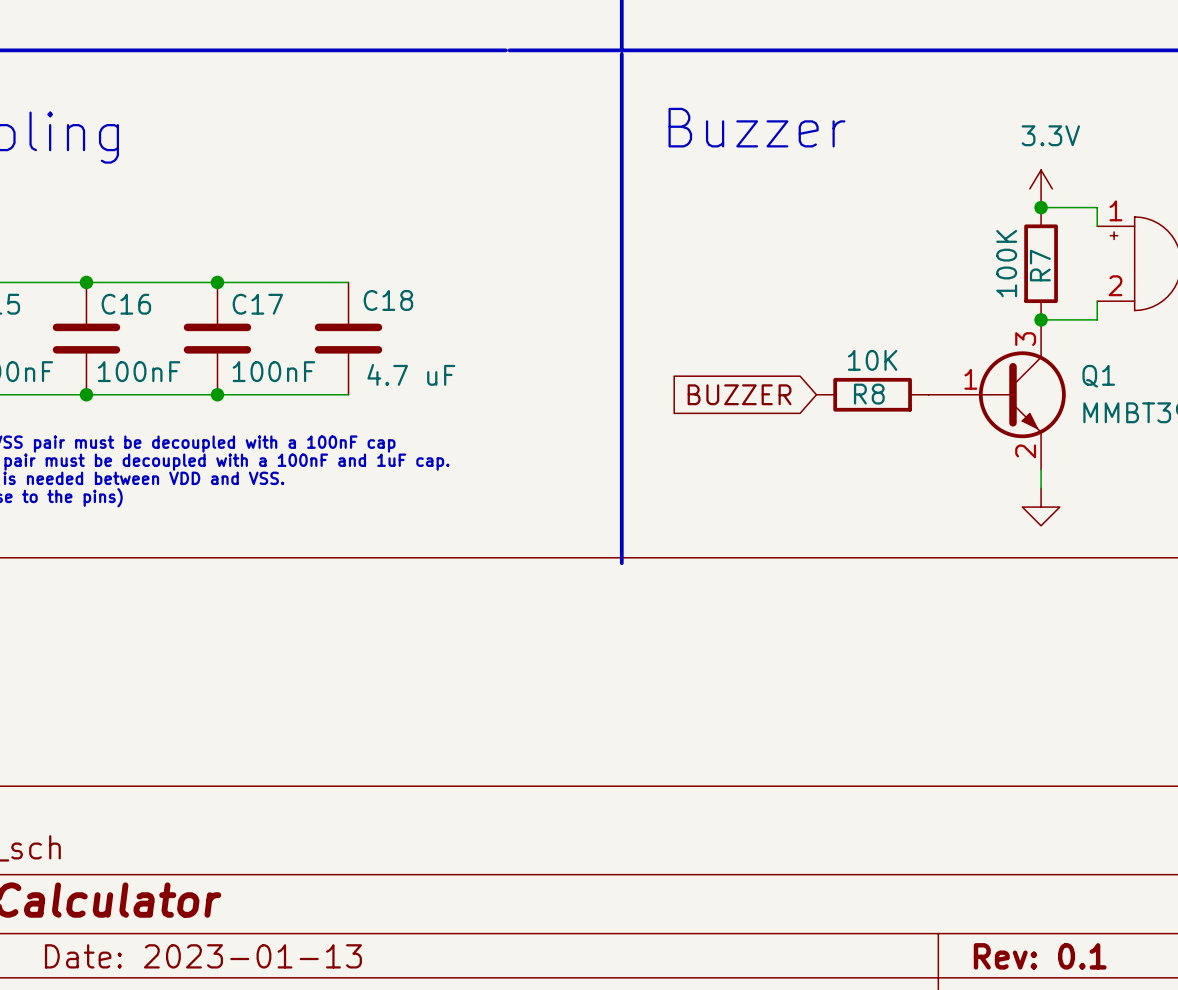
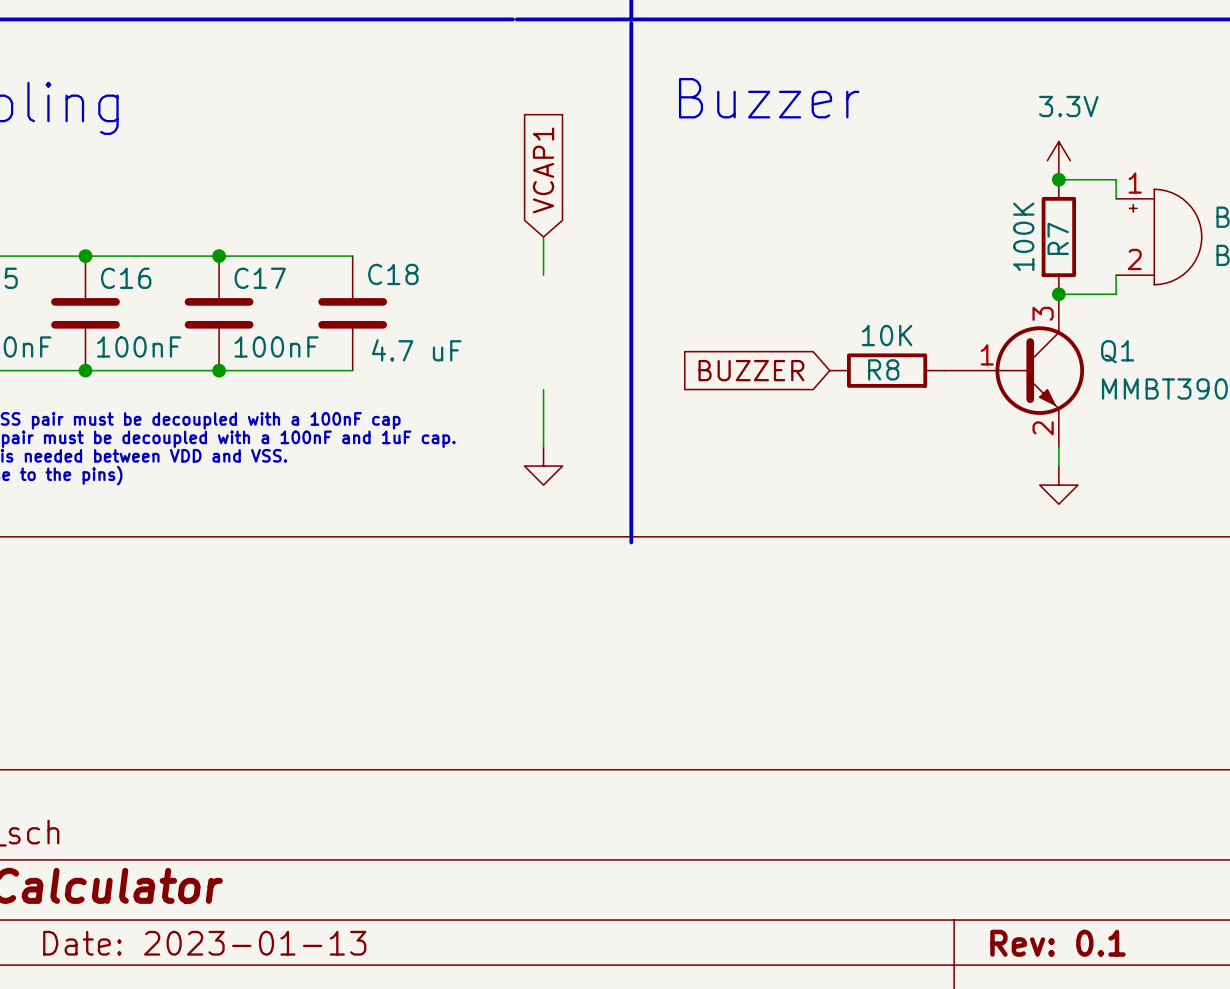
global label: none -> VCAP1 (543, 170)
wire: none -> (543, 237) (543, 275)
wire: none -> (543, 389) (543, 446)
power symbol: none -> (543, 466)

